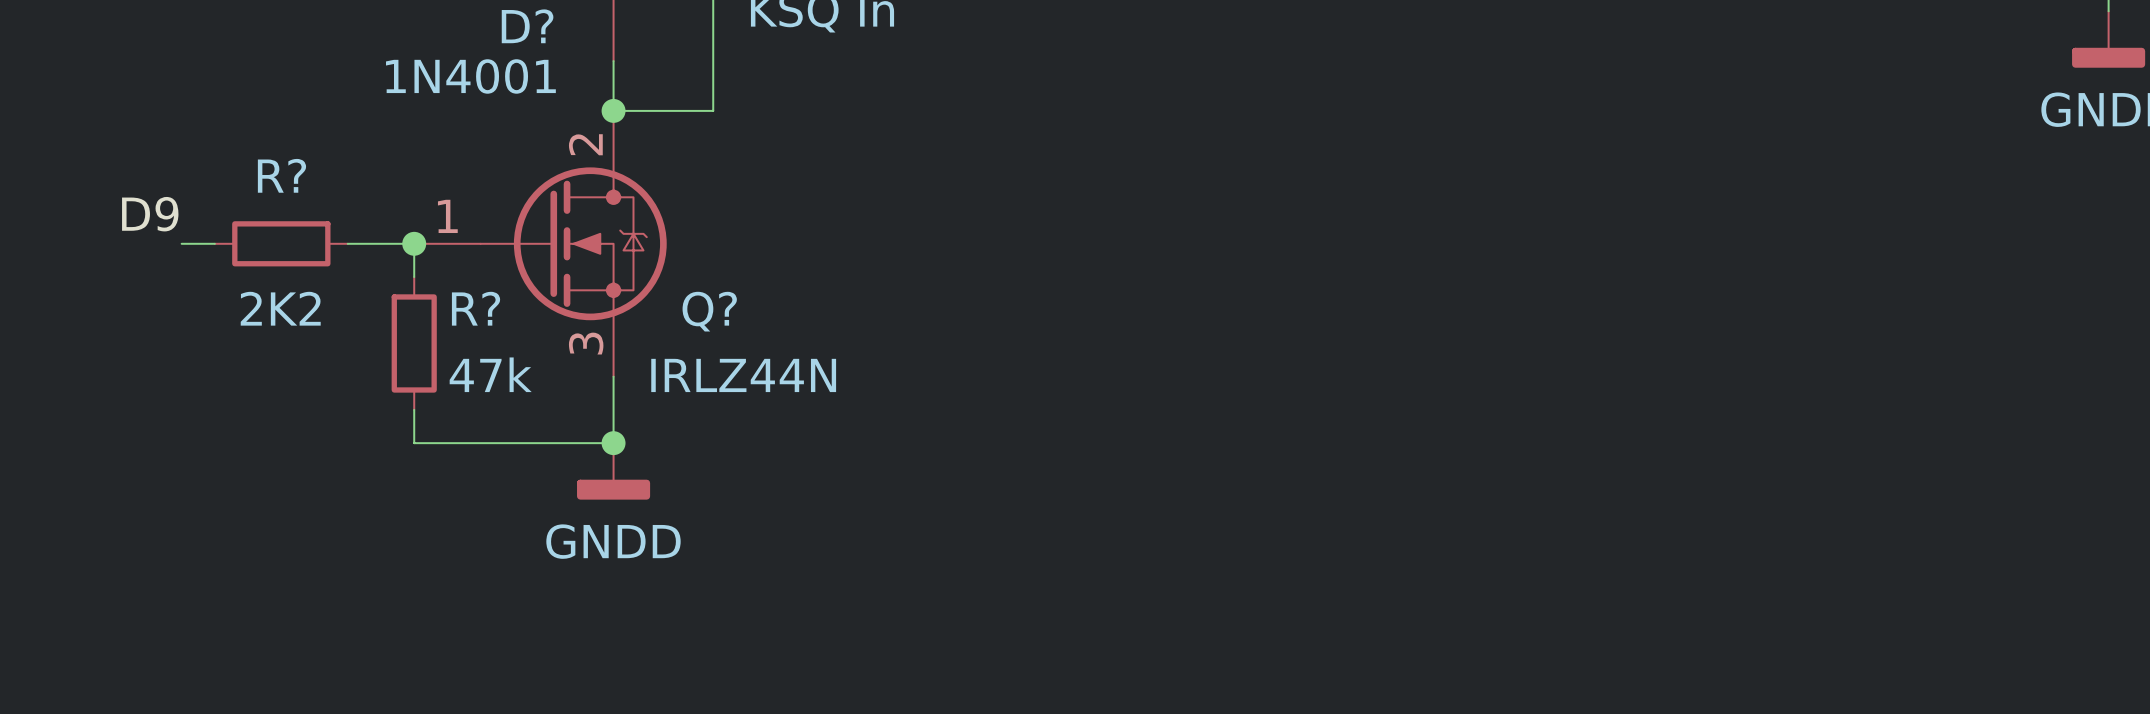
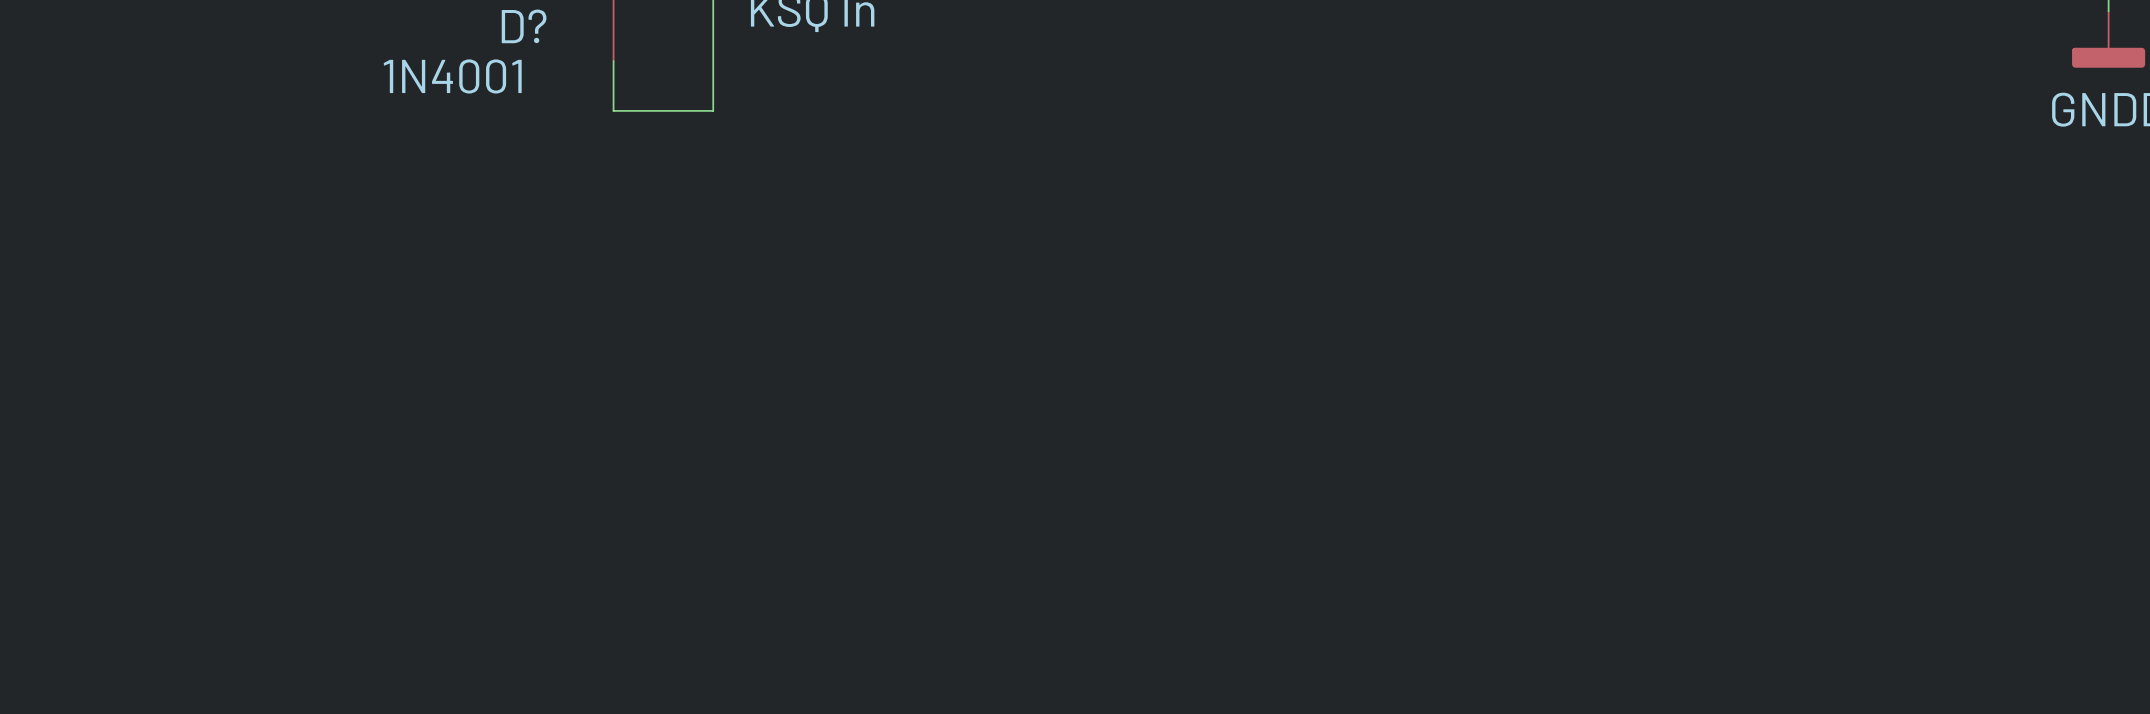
junction: (613, 110) -> none
label: D9 (150, 214) -> none
wire: (181, 243) (214, 243) -> none
R?: 2K2 (281, 243) -> none
wire: (347, 243) (414, 243) (414, 277) -> none
junction: (414, 243) -> none
Q?: IRLZ44N (540, 243) -> none
R?: 47k (414, 343) -> none
wire: (613, 376) (613, 443) (414, 443) (414, 409) -> none
junction: (613, 443) -> none
power symbol: GNDD (613, 471) -> none

